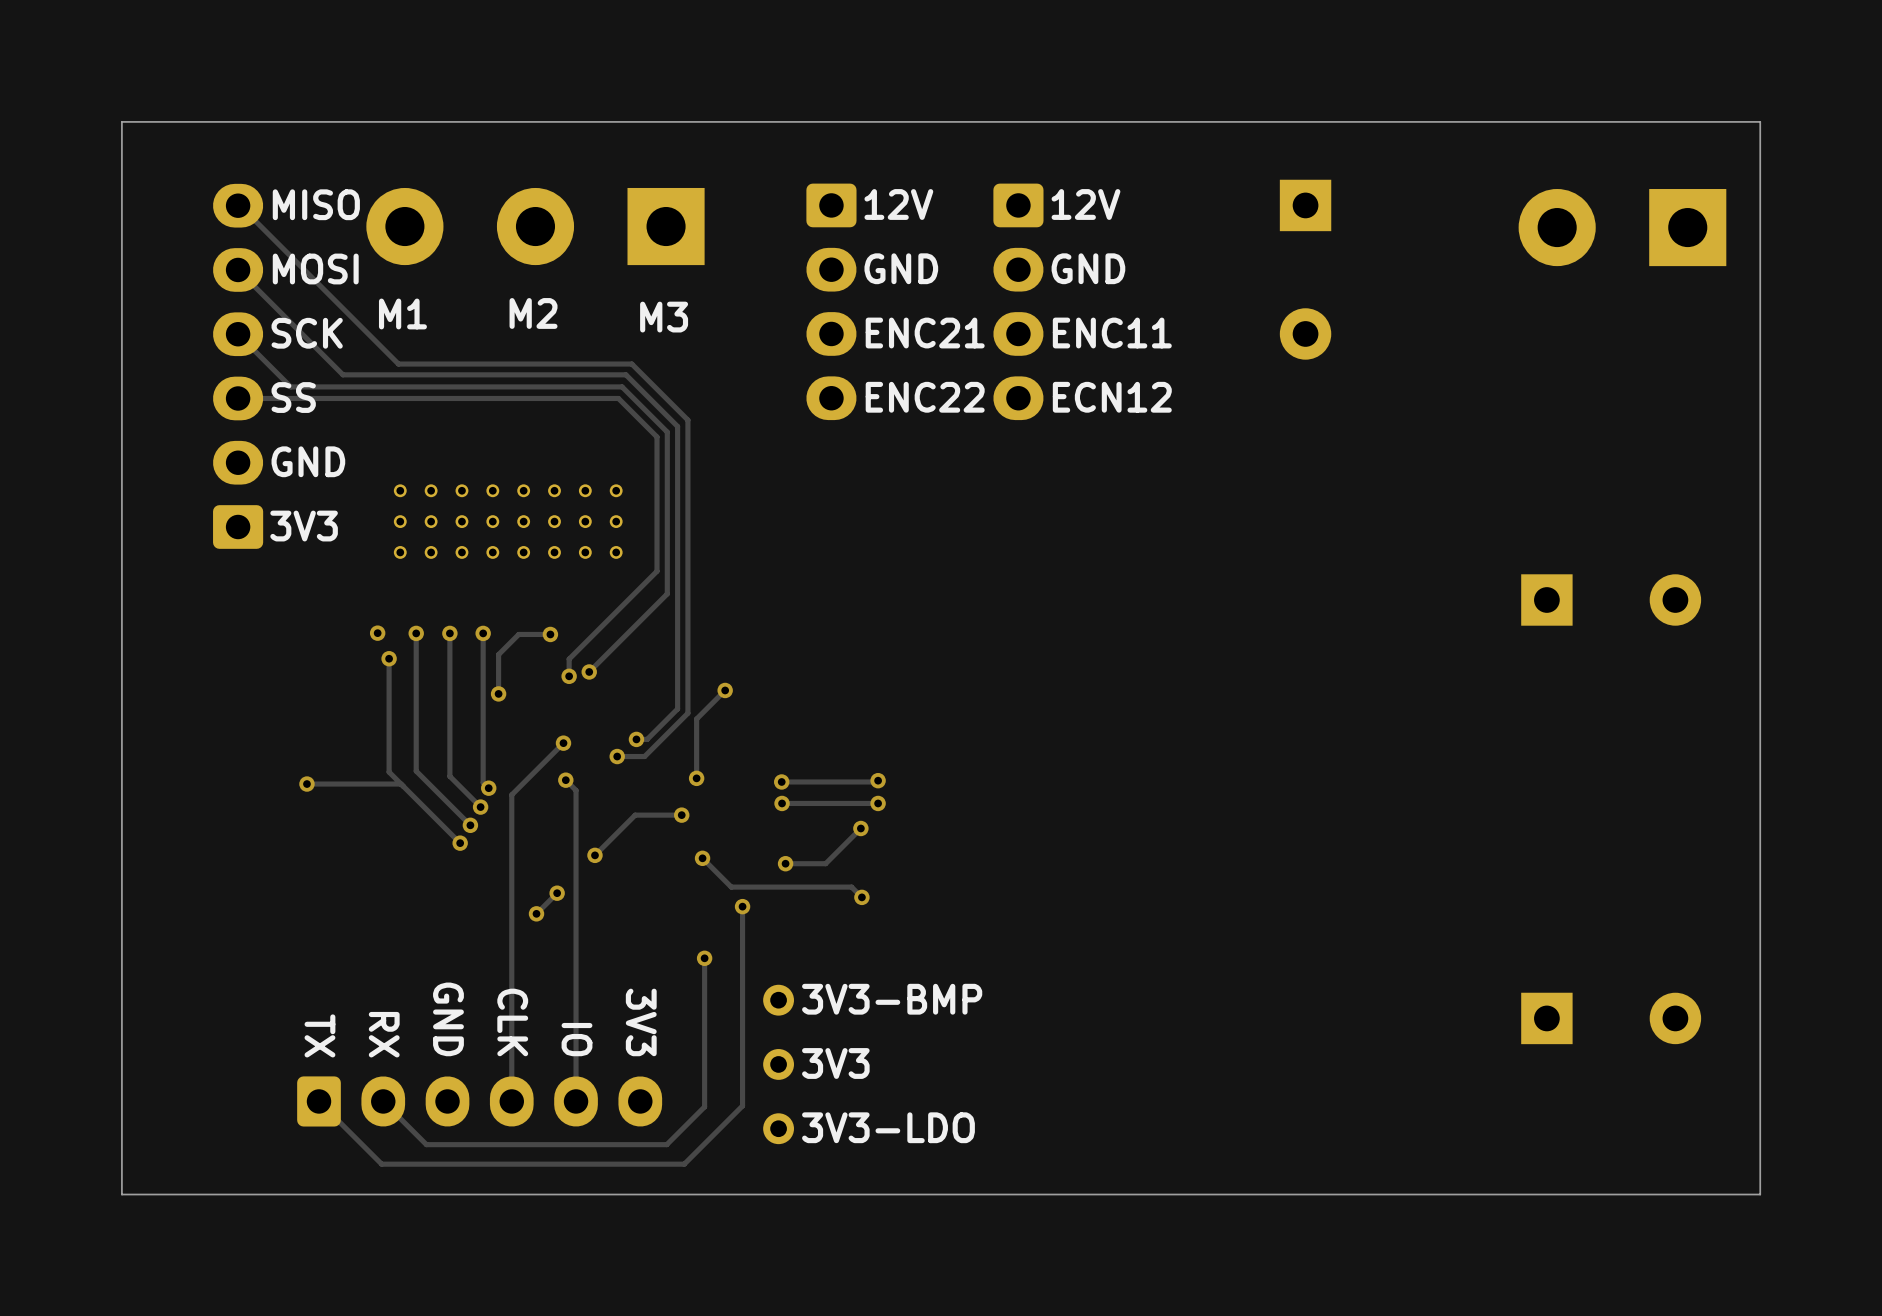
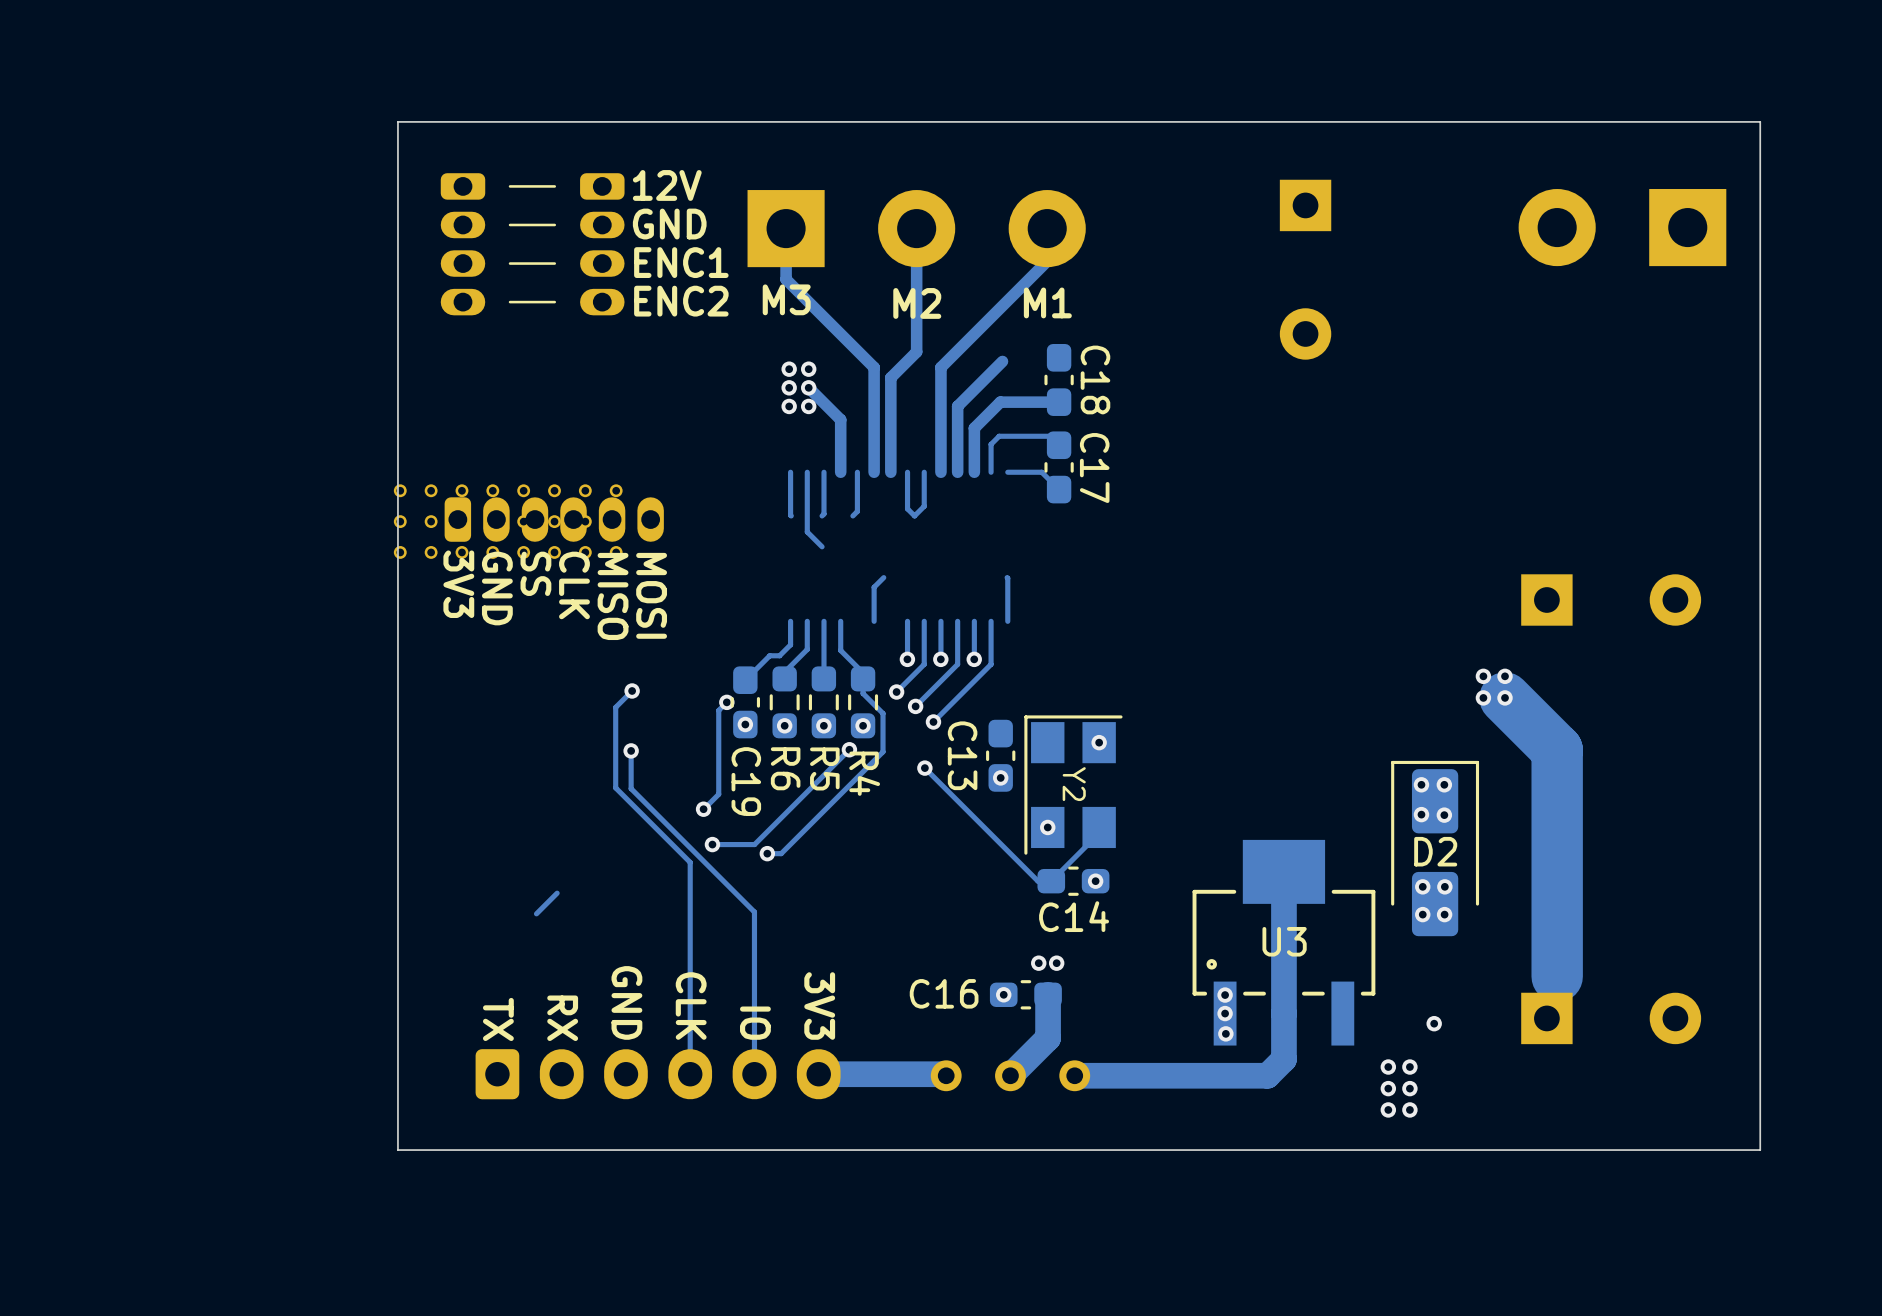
board edge: (397, 121) (121, 121) (121, 1194) (1760, 1194) (1760, 1150) -> (397, 121) (397, 1150) (1760, 1150)
text: none -> 12V (667, 185)
line: none -> (554, 186) (510, 186)
text rotation: 0° (316, 204) -> 90° clockwise (613, 596)
text position: MISO (316, 204) -> MISO (613, 596)
text: 12V (898, 204) -> none
text: 12V (1085, 204) -> none
track: (238, 205) (398, 364) (631, 364) (687, 420) (687, 713) (644, 756) (617, 756) -> none
line: none -> (554, 224) (510, 224)
text: none -> GND (669, 224)
part rotation: 0° (535, 226) -> 180° (916, 228)
part position: (535, 226) -> (916, 228)
track: none -> (786, 228) (786, 279) (874, 367) (874, 472)
track: none -> (916, 228) (916, 351) (890, 377) (890, 472)
track: none -> (1047, 228) (1047, 261) (940, 367) (940, 472)
part: none -> (463, 244)
part: none -> (602, 244)
text: none -> ENC1 (681, 262)
line: none -> (554, 263) (510, 263)
text: GND (901, 268) -> none
text: GND (1088, 268) -> none
track: (238, 269) (342, 374) (625, 374) (677, 426) (677, 708) (647, 739) (636, 739) -> none
text rotation: 0° (315, 269) -> 90° clockwise (651, 595)
text position: MOSI (315, 269) -> MOSI (651, 595)
text: none -> ENC2 (681, 301)
part: (831, 301) -> none
part: (1018, 301) -> none
line: none -> (554, 302) (510, 302)
text: none -> M1 (1047, 302)
text: M1 (402, 313) -> none
text position: M2 (533, 313) -> M2 (917, 303)
text position: M3 (664, 317) -> M3 (786, 299)
text: SCK (307, 333) -> none
text: ENC21 (925, 333) -> none
text: ENC11 (1112, 333) -> none
track: (238, 334) (290, 386) (622, 386) (667, 432) (667, 593) (589, 671) -> none
track: none -> (1002, 361) (957, 406) (957, 472)
part: (238, 366) -> none
via: none -> (789, 369)
via: none -> (808, 369)
C18: none -> (1059, 379)
via: none -> (789, 387)
track: none -> (808, 387) (840, 419) (840, 472)
via: none -> (808, 387)
text rotation: 0° (293, 397) -> 90° clockwise (535, 573)
text position: SS (293, 397) -> SS (535, 573)
text: ENC22 (925, 397) -> none
text: ECN12 (1112, 397) -> none
track: (238, 398) (618, 398) (657, 436) (657, 571) (569, 659) (569, 676) -> none
track: none -> (1059, 402) (1000, 402) (974, 428) (974, 472)
via: none -> (789, 406)
via: none -> (808, 406)
track: none -> (1059, 445) (1050, 436) (999, 436) (991, 444) (991, 472)
text: GND (308, 461) -> none
C17: none -> (1059, 467)
track: none -> (790, 472) (791, 515)
track: none -> (807, 472) (807, 532) (822, 546)
track: none -> (824, 472) (824, 514) (822, 515)
track: none -> (857, 472) (857, 511) (852, 515)
track: none -> (924, 472) (924, 506) (914, 515) (907, 508) (907, 472)
track: none -> (1007, 472) (1041, 472) (1059, 489)
part: none -> (554, 519)
text rotation: 0° (304, 526) -> 90° clockwise (458, 584)
text position: 3V3 (304, 526) -> 3V3 (458, 584)
track: none -> (883, 577) (874, 587) (874, 621)
track: none -> (1007, 577) (1007, 621)
text: none -> CLK (574, 585)
text: none -> GND (497, 588)
track: none -> (790, 621) (790, 644) (779, 655) (769, 655) (745, 680)
track: none -> (807, 621) (807, 649) (784, 672) (784, 678)
track: none -> (824, 621) (824, 678)
track: none -> (840, 621) (840, 650) (863, 672) (863, 693) (883, 713) (883, 751) (781, 853) (767, 853)
track: none -> (907, 621) (907, 659)
track: none -> (924, 621) (924, 664) (896, 692)
track: none -> (940, 621) (940, 659)
track: none -> (957, 621) (957, 664) (915, 706)
track: none -> (974, 621) (974, 659)
track: none -> (991, 621) (991, 664) (933, 721)
via: (377, 633) -> none
track: (416, 633) (416, 771) (470, 825) -> none
via: (416, 633) -> none
track: (449, 633) (449, 776) (480, 807) -> none
via: (449, 633) -> none
track: (483, 633) (483, 782) (488, 788) -> none
via: (483, 633) -> none
track: (550, 634) (518, 634) (498, 654) (498, 693) -> none
via: (550, 634) -> none
track: (389, 658) (389, 772) (460, 843) -> none
via: (389, 658) -> none
via: none -> (907, 659)
via: none -> (940, 659)
via: none -> (974, 659)
via: (589, 671) -> none
via: (569, 676) -> none
via: none -> (1483, 676)
via: none -> (1505, 676)
track: none -> (632, 690) (615, 707) (615, 787) (690, 862) (690, 1074)
via: none -> (632, 690)
track: (725, 690) (696, 719) (696, 778) -> none
via position: (725, 690) -> (726, 702)
via: none -> (896, 692)
via: (498, 693) -> none
via: none -> (1483, 697)
track: none -> (1505, 697) (1557, 750) (1557, 976)
via: none -> (1505, 697)
track: none -> (726, 702) (718, 710) (718, 794) (703, 809)
C19: none -> (745, 702)
R6: none -> (784, 702)
R5: none -> (823, 702)
R4: none -> (863, 702)
via: none -> (915, 706)
via: none -> (933, 721)
via: none -> (745, 724)
via: none -> (784, 725)
via: none -> (823, 725)
via: none -> (863, 725)
via: (636, 739) -> none
via: none -> (1099, 742)
track: (563, 743) (511, 794) (511, 1101) -> none
via: (563, 743) -> none
track: none -> (849, 749) (754, 844) (712, 844)
via: none -> (849, 749)
track: none -> (631, 750) (631, 788) (754, 912) (754, 1074)
via: none -> (631, 750)
C13: none -> (1000, 755)
via: (617, 756) -> none
track: none -> (924, 768) (1037, 881) (1051, 881) (1099, 833) (1099, 827)
via: none -> (924, 768)
via: none -> (1000, 777)
via: (696, 778) -> none
track: (565, 780) (576, 790) (576, 1101) -> none
via: (565, 780) -> none
track: (878, 780) (781, 781) -> none
via: (878, 780) -> none
via: (781, 781) -> none
via: (306, 784) -> none
track: (401, 784) (306, 784) -> none
via: none -> (1421, 784)
via: none -> (1444, 784)
Y2: none -> (1073, 785)
via: (488, 788) -> none
via: (782, 803) -> none
track: (878, 803) (782, 803) -> none
via: (878, 803) -> none
via: (480, 807) -> none
via: none -> (703, 809)
via: none -> (1421, 814)
track: (681, 815) (635, 815) (594, 855) -> none
via: (681, 815) -> none
via: none -> (1444, 815)
via: (470, 825) -> none
via: none -> (1047, 827)
track: (860, 828) (825, 863) (785, 863) -> none
via: (860, 828) -> none
via: (460, 843) -> none
D2: none -> (1435, 848)
via: (594, 855) -> none
track: (702, 858) (731, 887) (851, 887) (861, 897) -> none
via position: (702, 858) -> (712, 844)
via position: (785, 863) -> (767, 853)
track: none -> (1283, 871) (1283, 1059) (1267, 1075) (1074, 1075)
C14: none -> (1073, 881)
via: none -> (1095, 881)
via: none -> (1422, 886)
via: none -> (1444, 886)
via: (557, 893) -> none
via: (861, 897) -> none
track: (742, 906) (742, 1105) (684, 1164) (381, 1164) (319, 1101) -> none
via: (742, 906) -> none
via: (536, 913) -> none
via: none -> (1422, 914)
via: none -> (1444, 914)
U3: none -> (1283, 942)
track: (704, 958) (704, 1106) (666, 1144) (426, 1144) (383, 1101) -> none
via: (704, 958) -> none
via: none -> (1038, 963)
via: none -> (1056, 963)
via: none -> (1003, 994)
C16: none -> (1025, 994)
track: none -> (1048, 994) (1048, 1038) (1010, 1075)
via: none -> (1225, 995)
text: 3V3-BMP (892, 999) -> none
via: none -> (1225, 1013)
text position: GND (448, 1019) -> GND (626, 1002)
text position: CLK (512, 1022) -> CLK (691, 1006)
text: 3V3 (641, 1022) -> none
via: none -> (1434, 1023)
via: none -> (1225, 1033)
text position: RX (384, 1034) -> RX (562, 1018)
text position: TX (319, 1035) -> TX (498, 1019)
text position: IO (576, 1039) -> IO (755, 1023)
text rotation: 0° (835, 1063) -> 90° clockwise (819, 1006)
part rotation: 0° (778, 1064) -> 90° clockwise (1010, 1075)
part position: (778, 1064) -> (1010, 1075)
via: none -> (1388, 1067)
via: none -> (1409, 1067)
track: none -> (818, 1074) (944, 1074) (946, 1075)
via: none -> (1388, 1088)
via: none -> (1409, 1088)
part position: (479, 1101) -> (658, 1074)
via: none -> (1388, 1109)
via: none -> (1409, 1109)
text: 3V3-LDO (888, 1127) -> none

